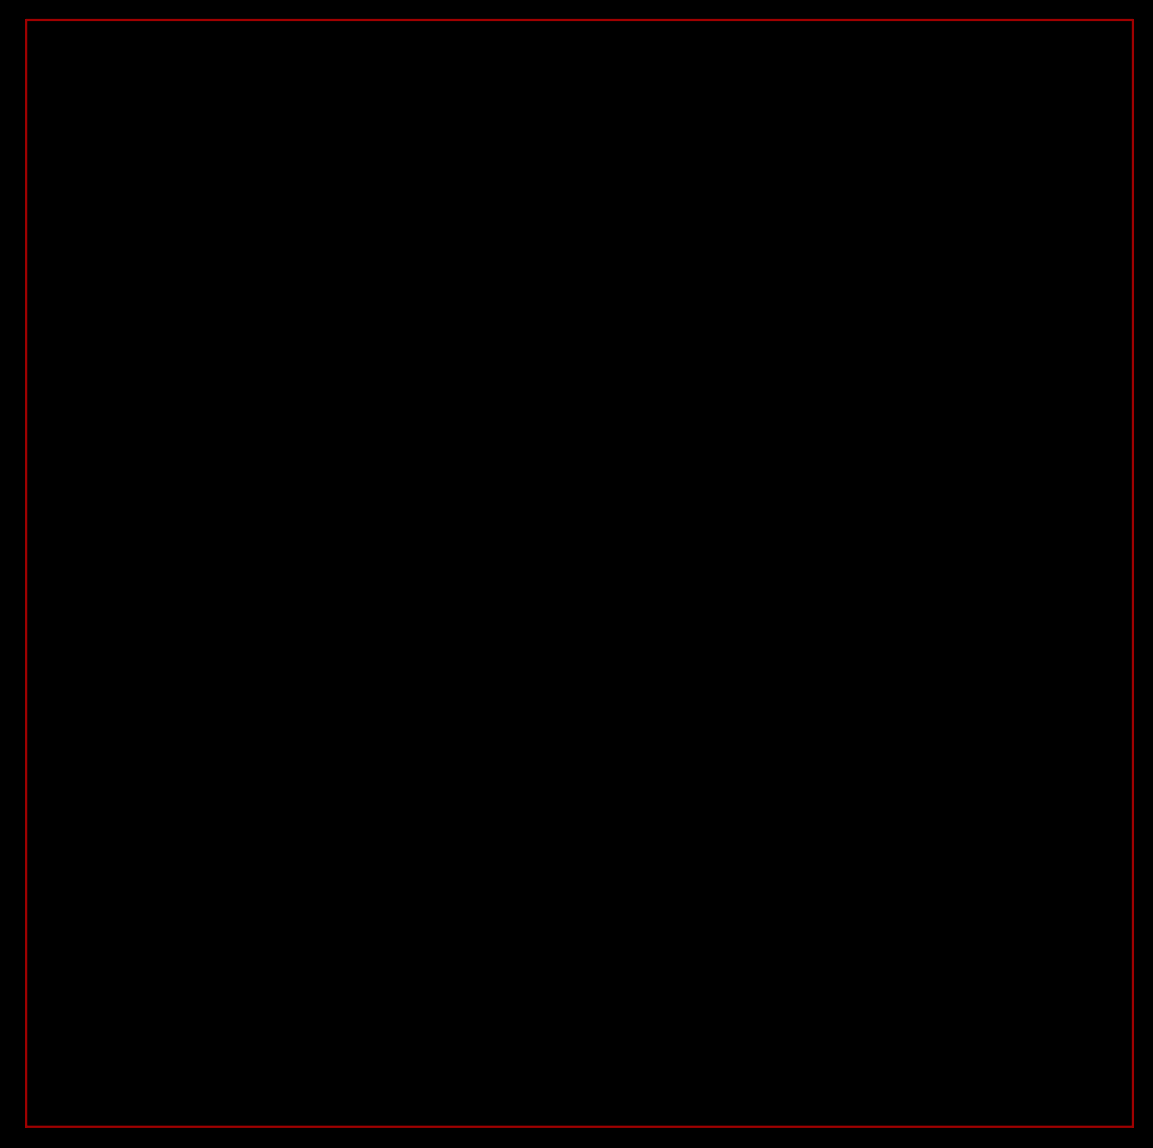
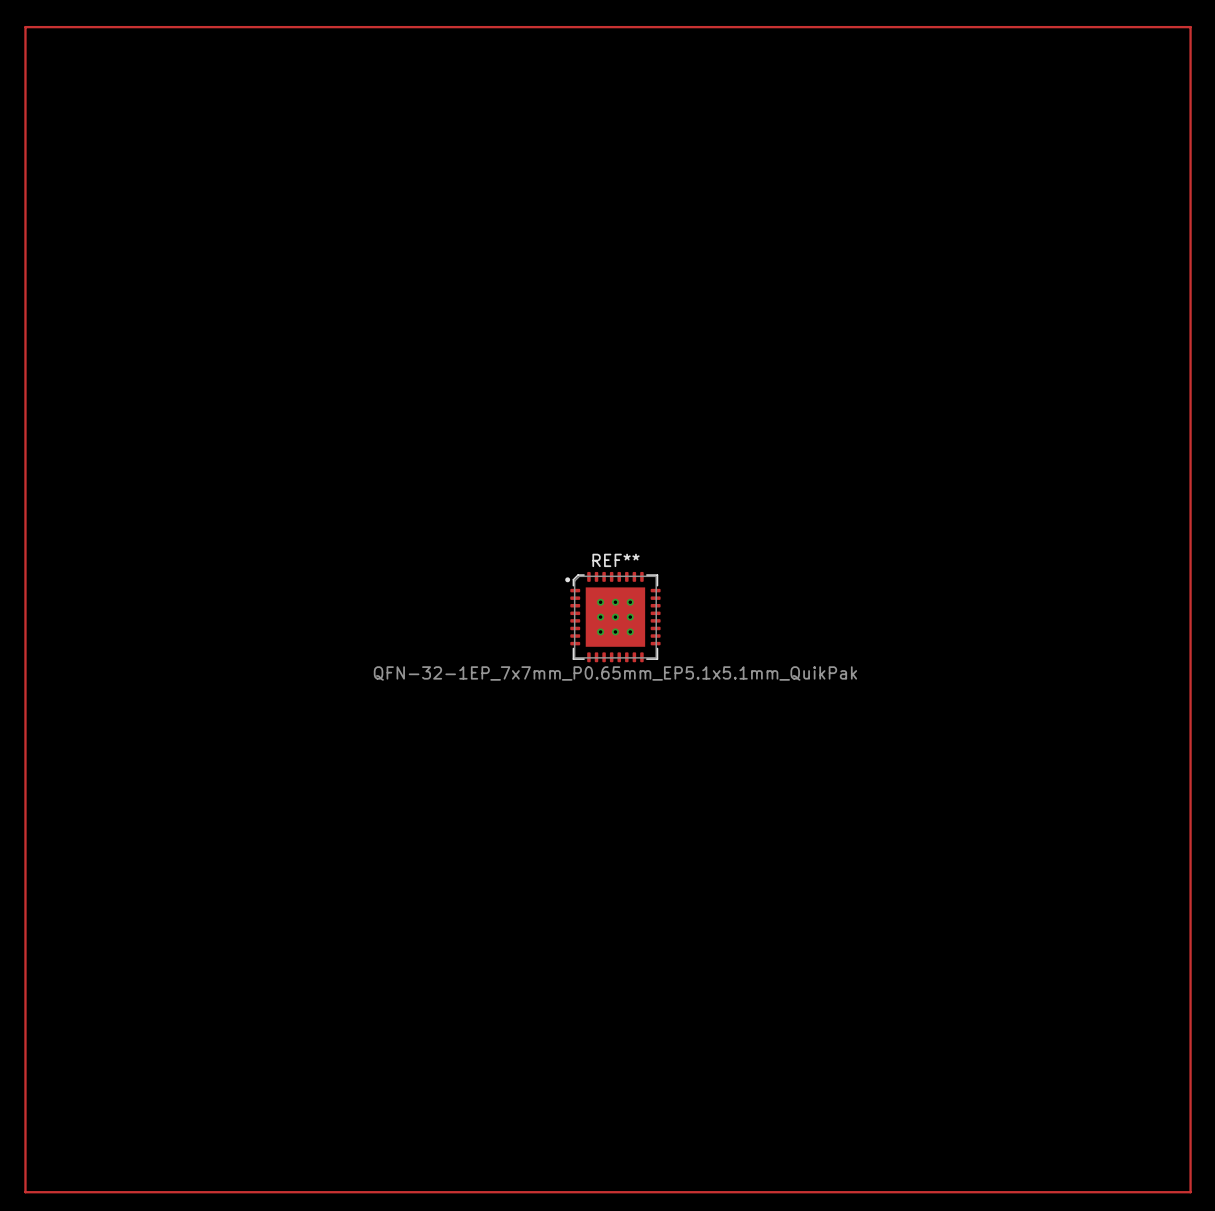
REF**: none -> QFN-32-1EP_7x7mm_P0.65mm_EP5.1x5.1mm_QuikPak (612, 617)

